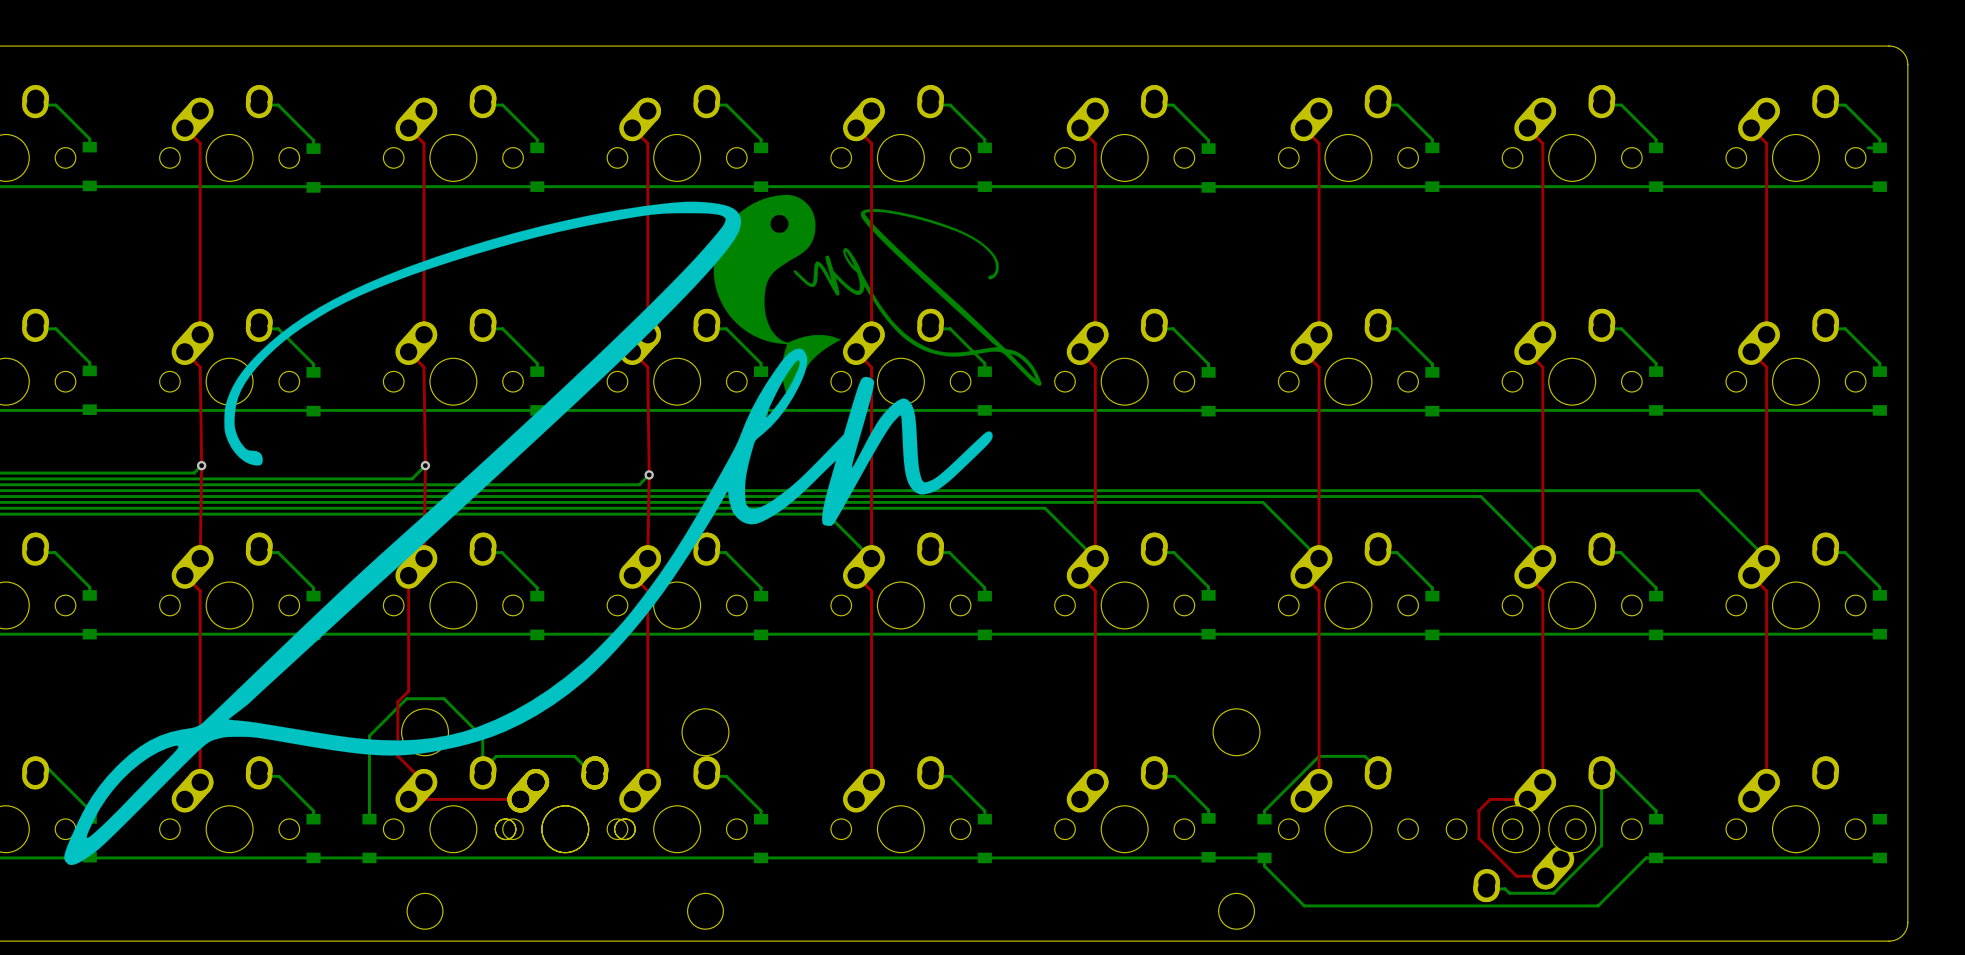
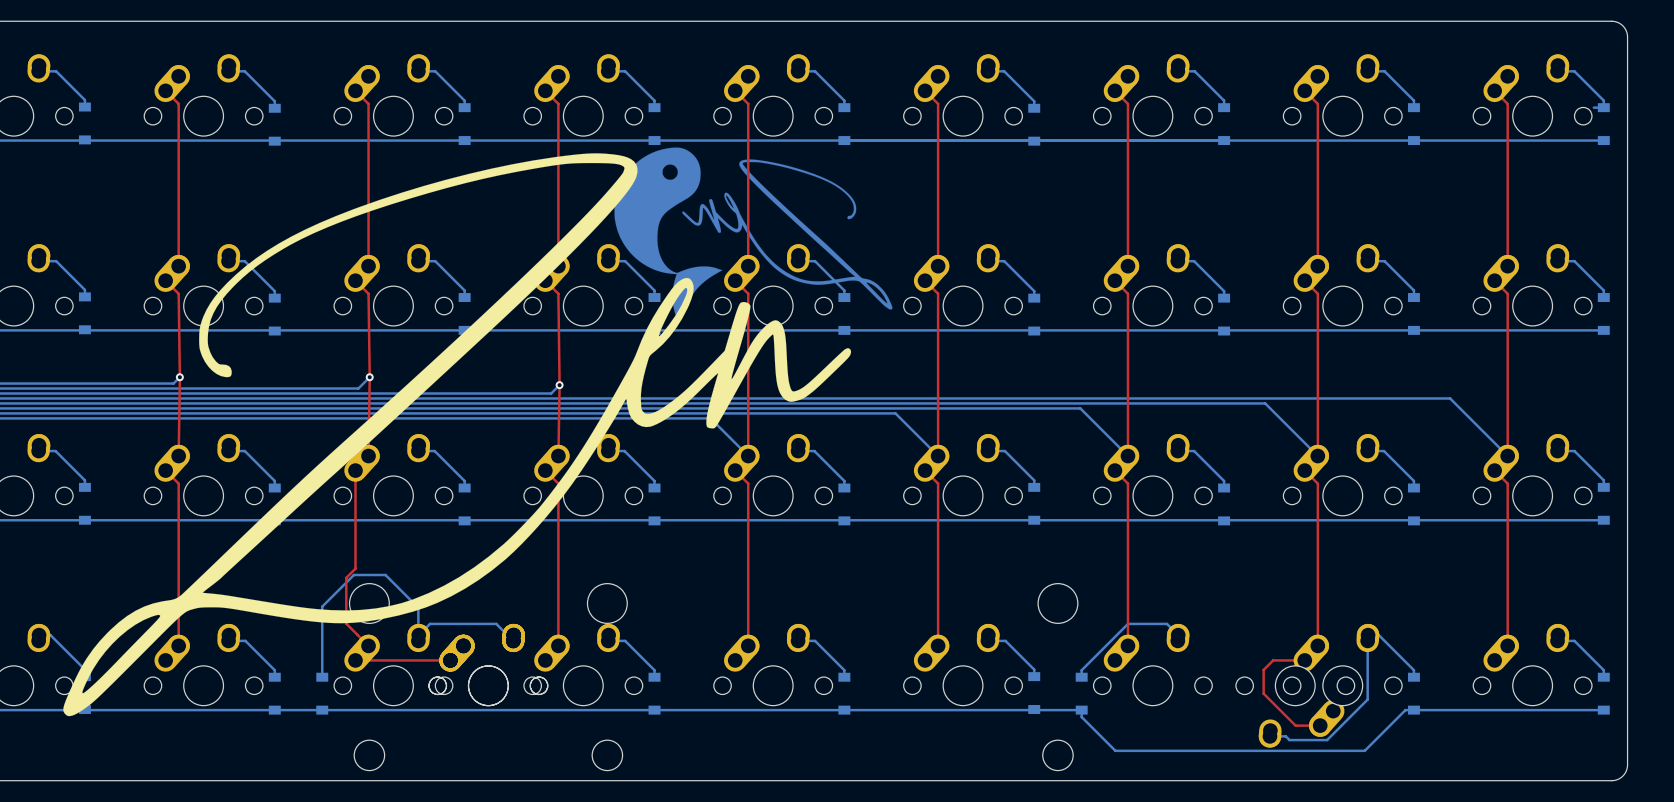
bottom track: none -> (1557, 640) (1574, 640) (1603, 670) (1603, 677)

